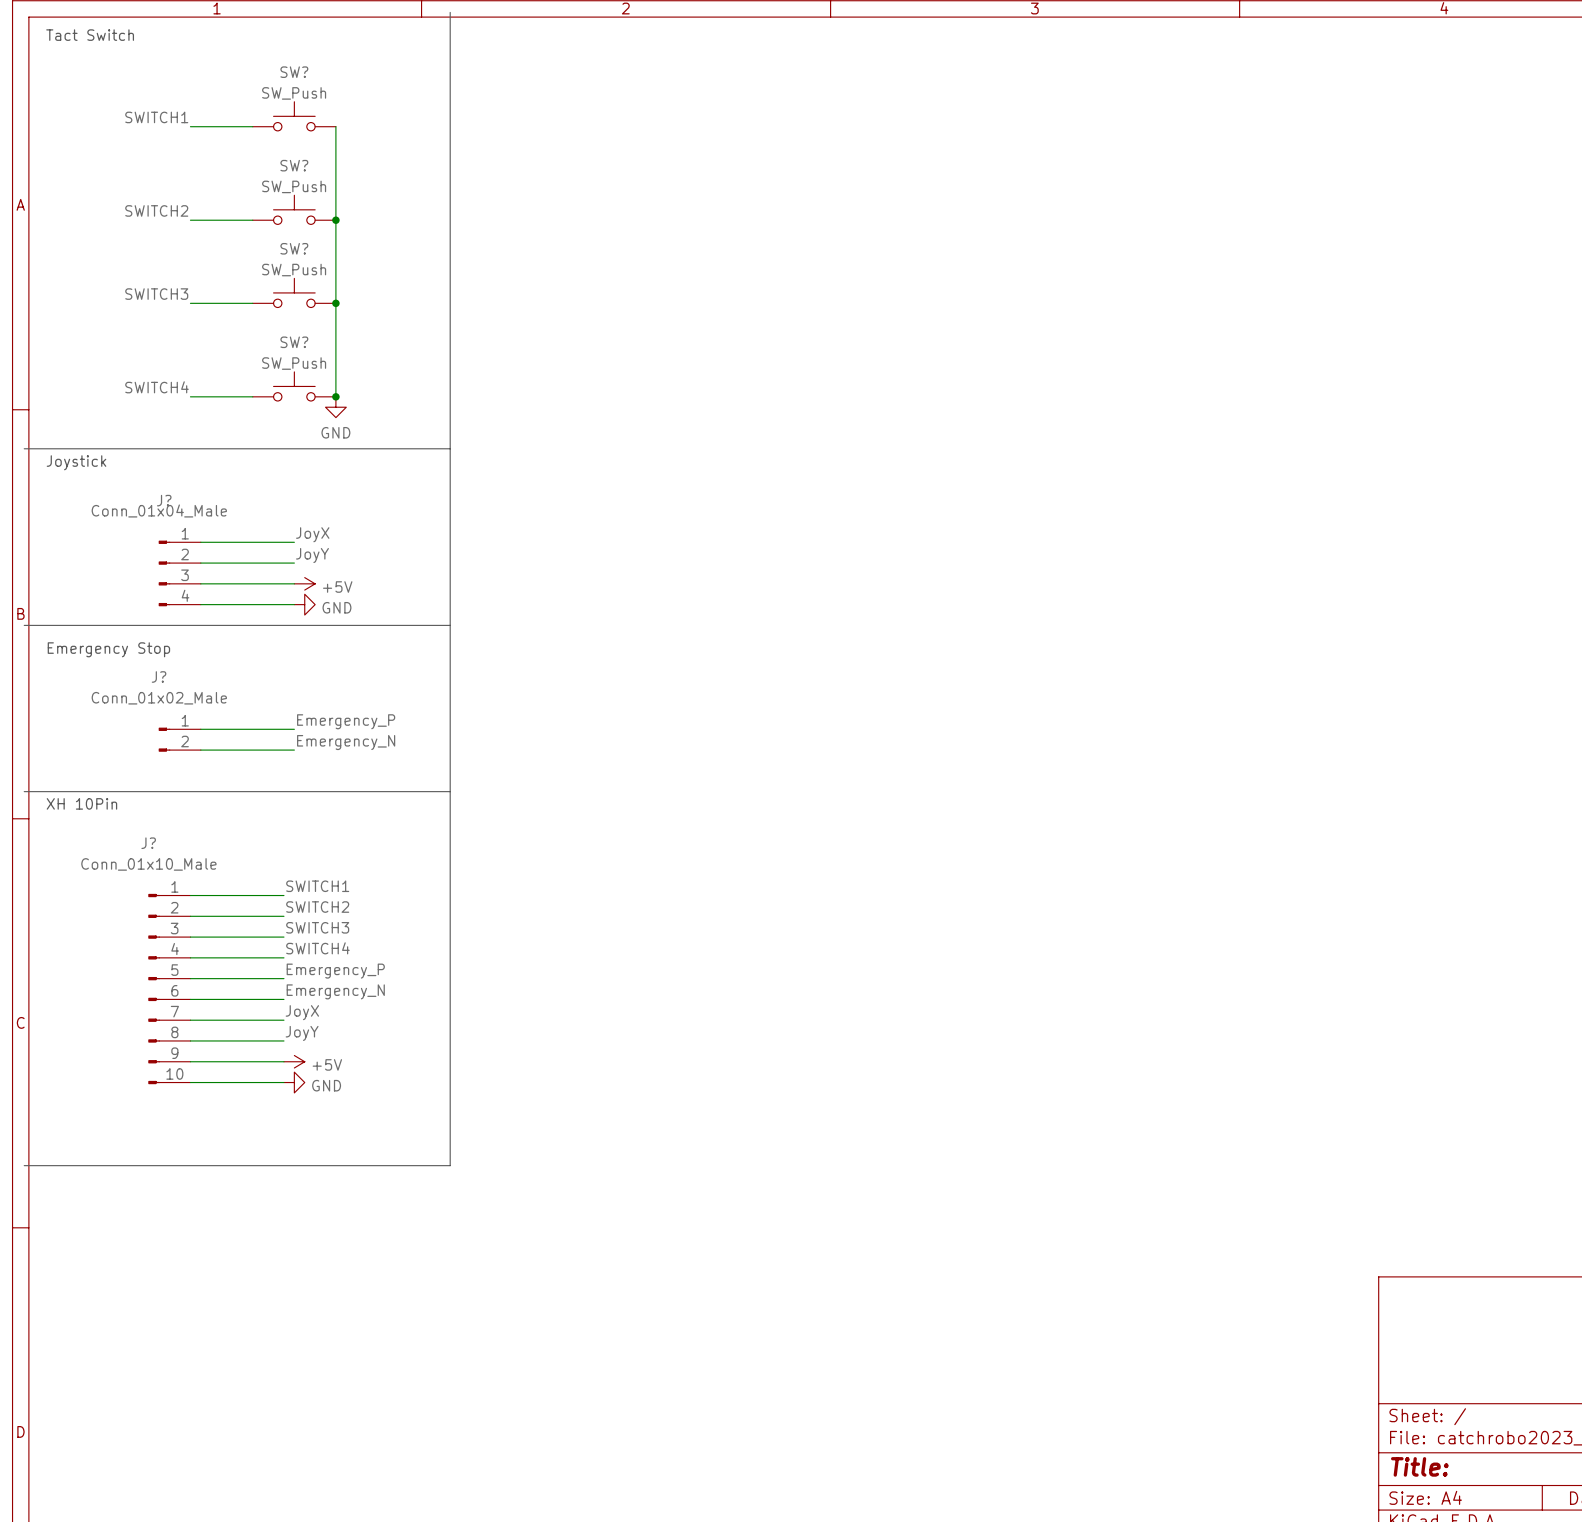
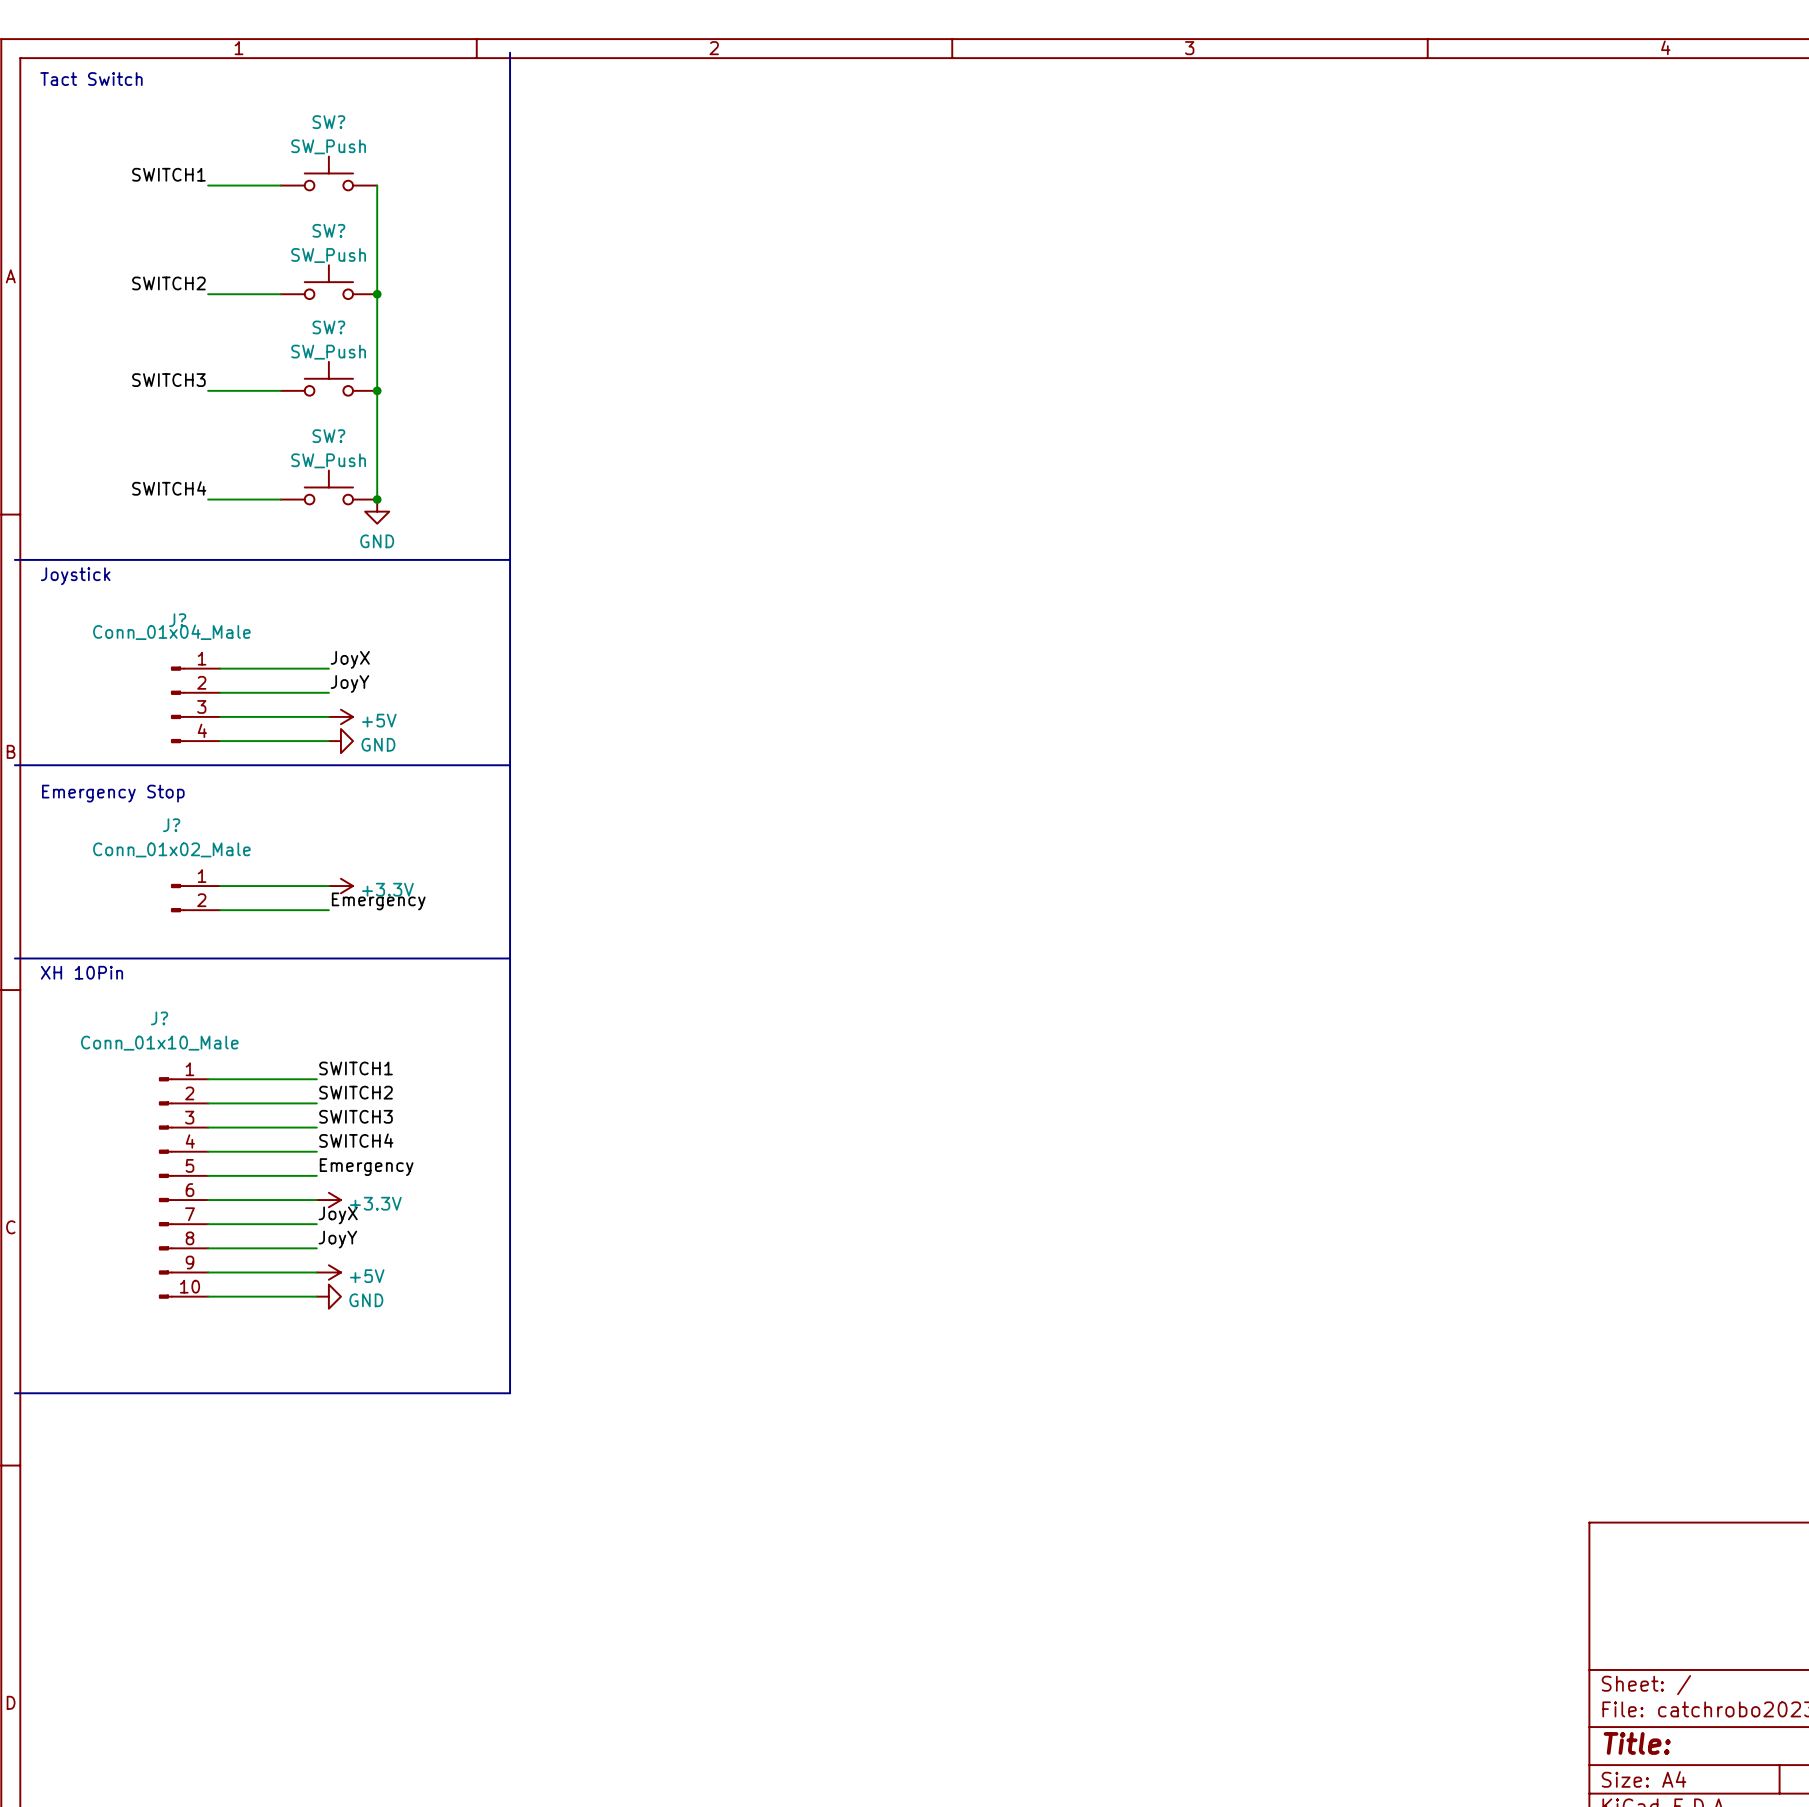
label: Emergency_P (346, 721) -> none
power symbol: none -> +3.3V (340, 886)
label: Emergency_N (346, 742) -> Emergency (378, 901)
label: Emergency_P (335, 971) -> Emergency (366, 1167)
label: Emergency_N (335, 991) -> none
power symbol: none -> +3.3V (328, 1200)

